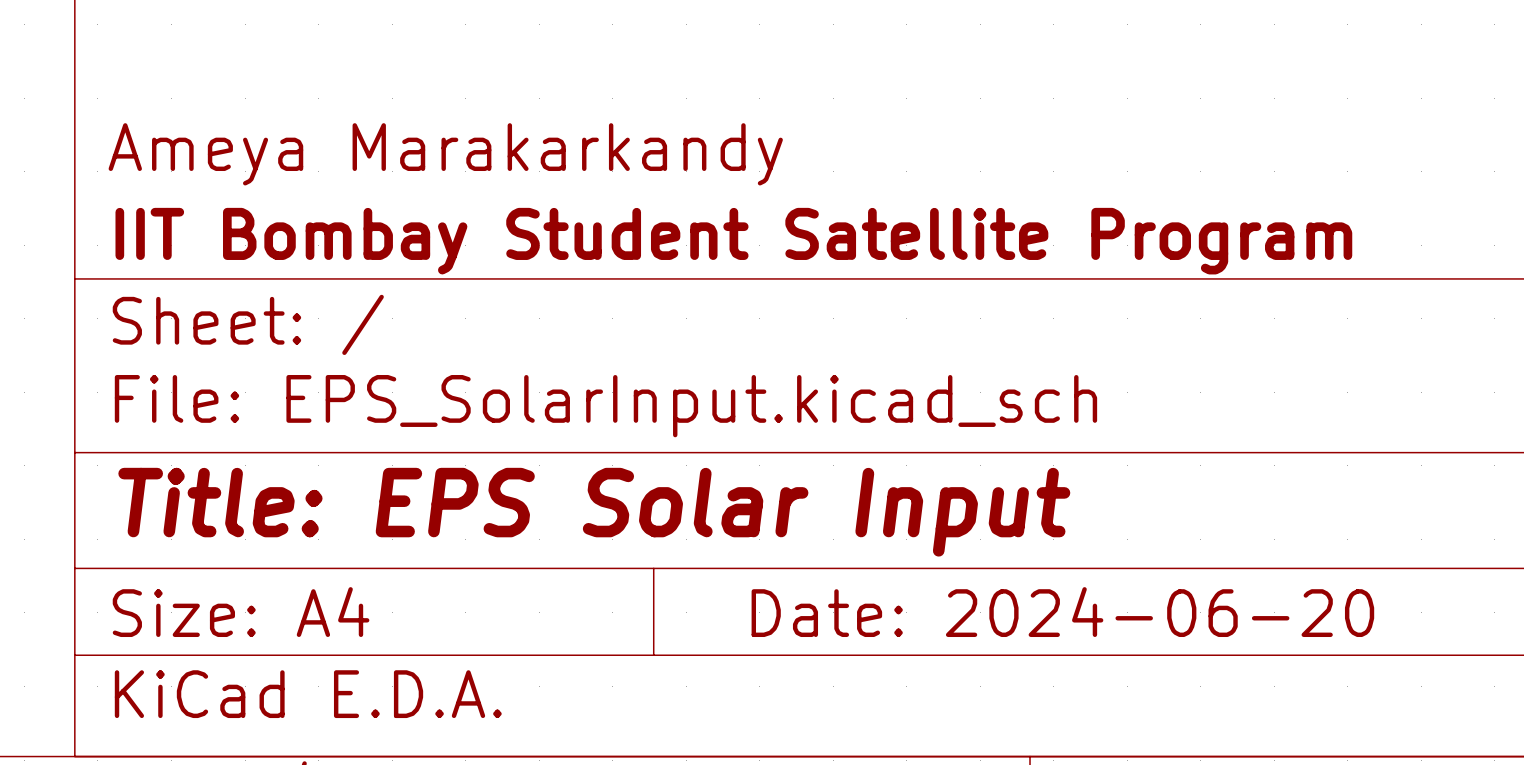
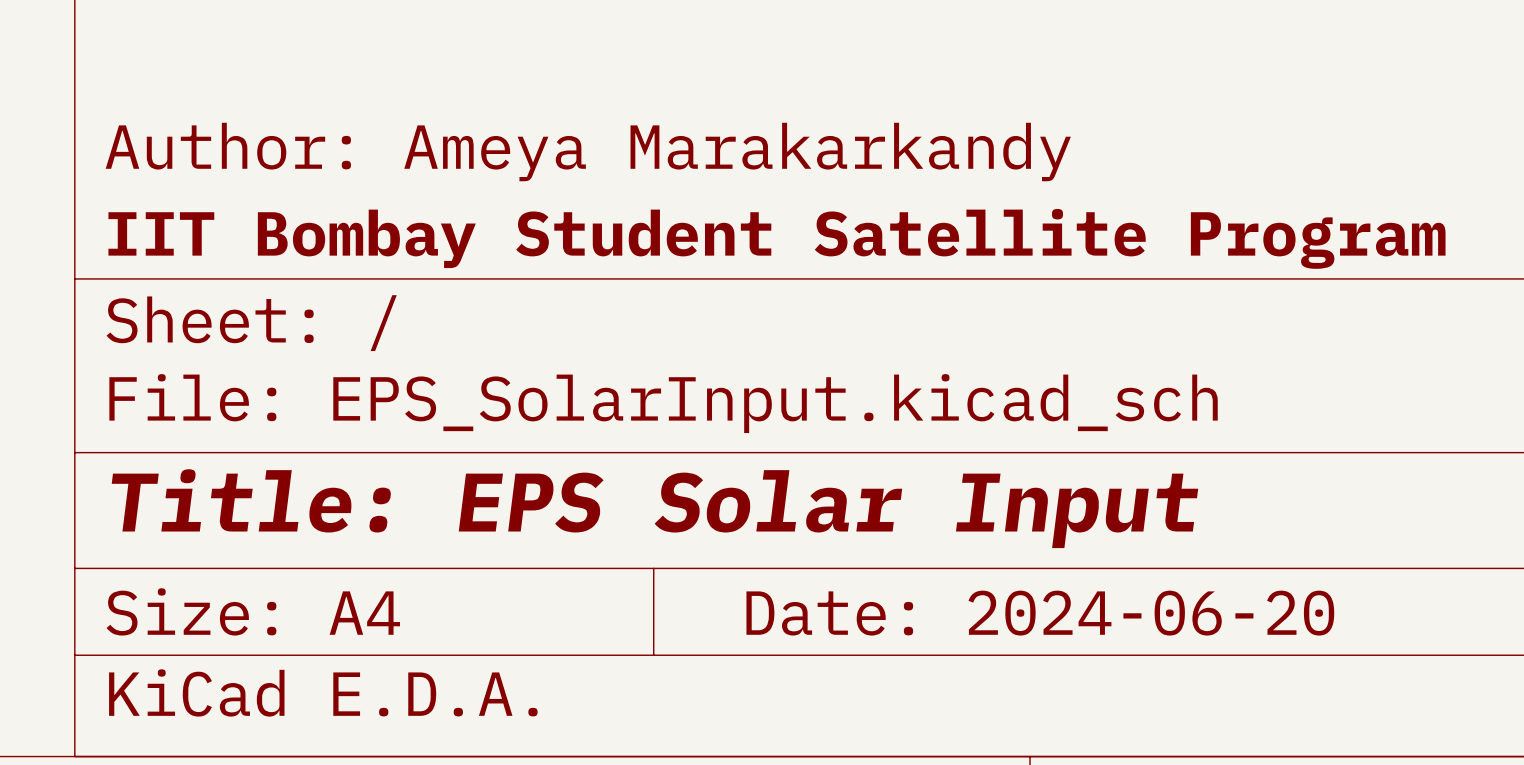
title block: Ameya Marakarkandy (445, 154) -> Author: Ameya Marakarkandy (588, 152)

